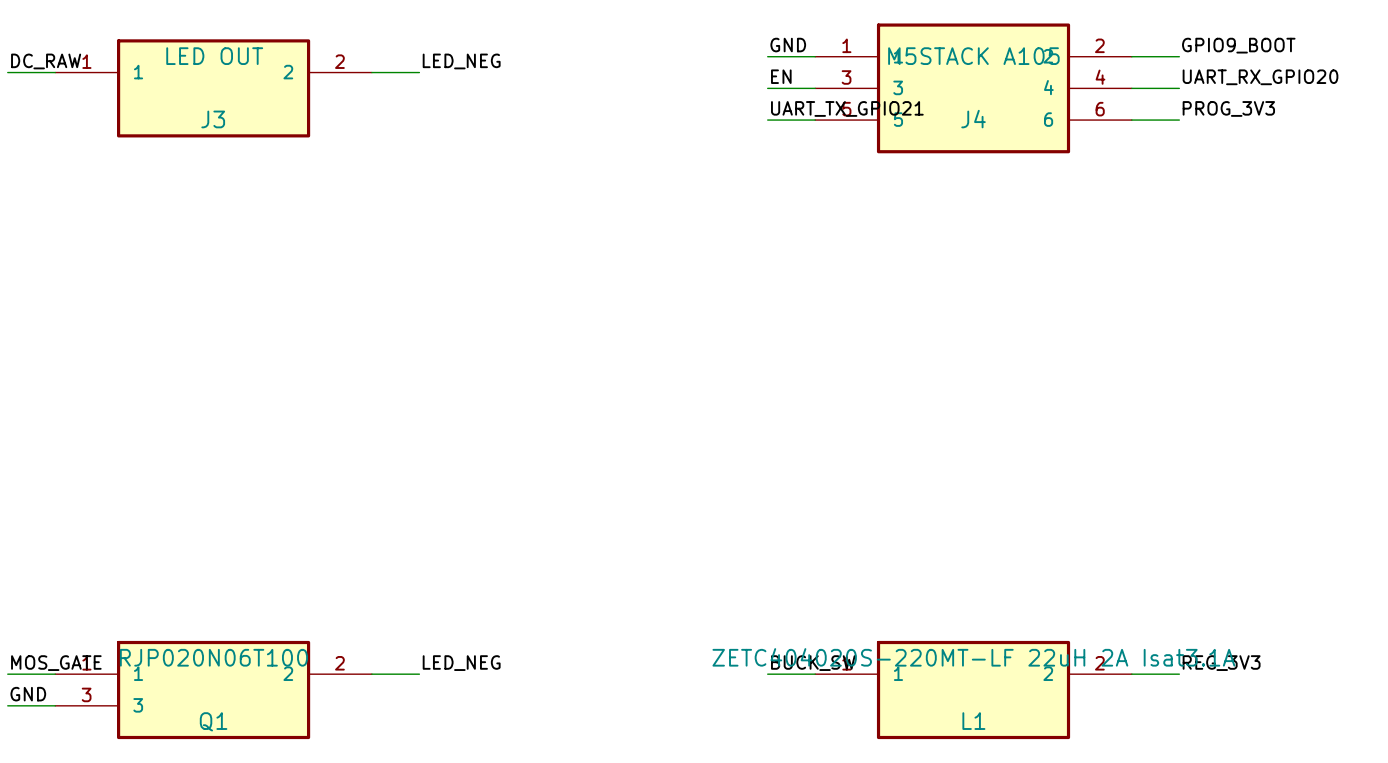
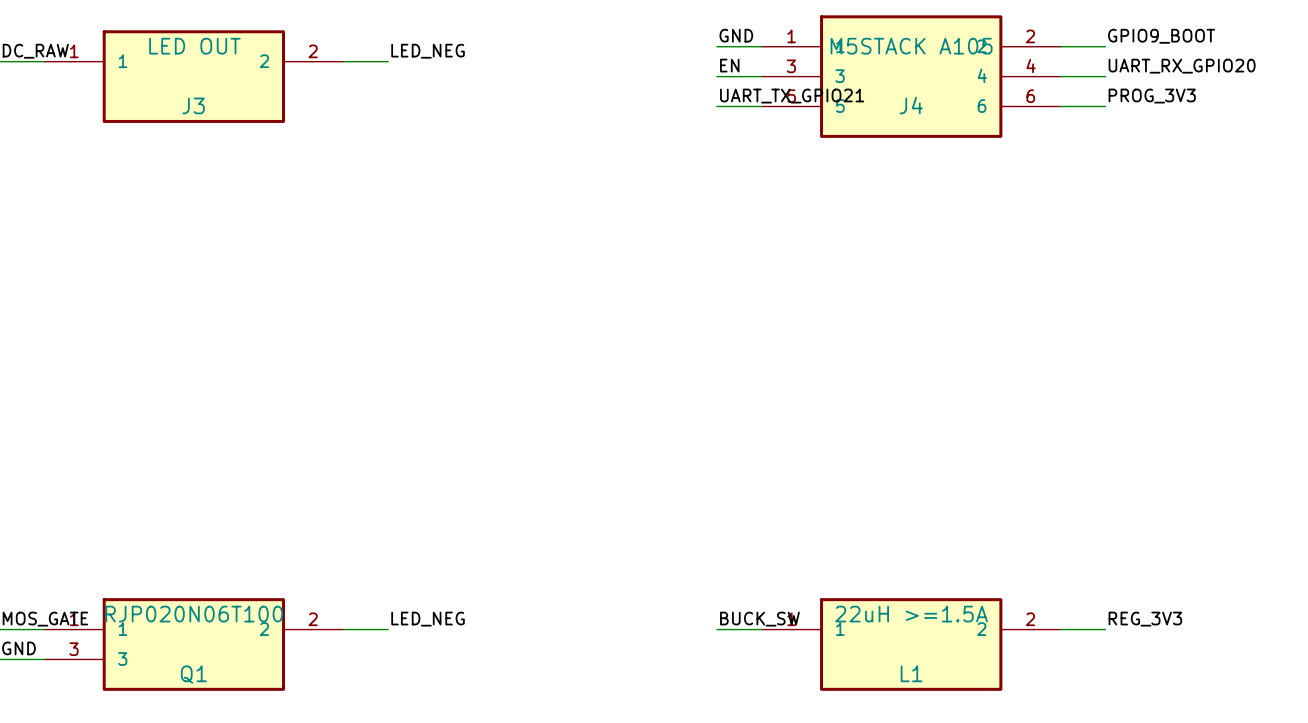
L1 value: ZETC404020S-220MT-LF 22uH 2A Isat3.1A (973, 657) -> 22uH >=1.5A (911, 614)

